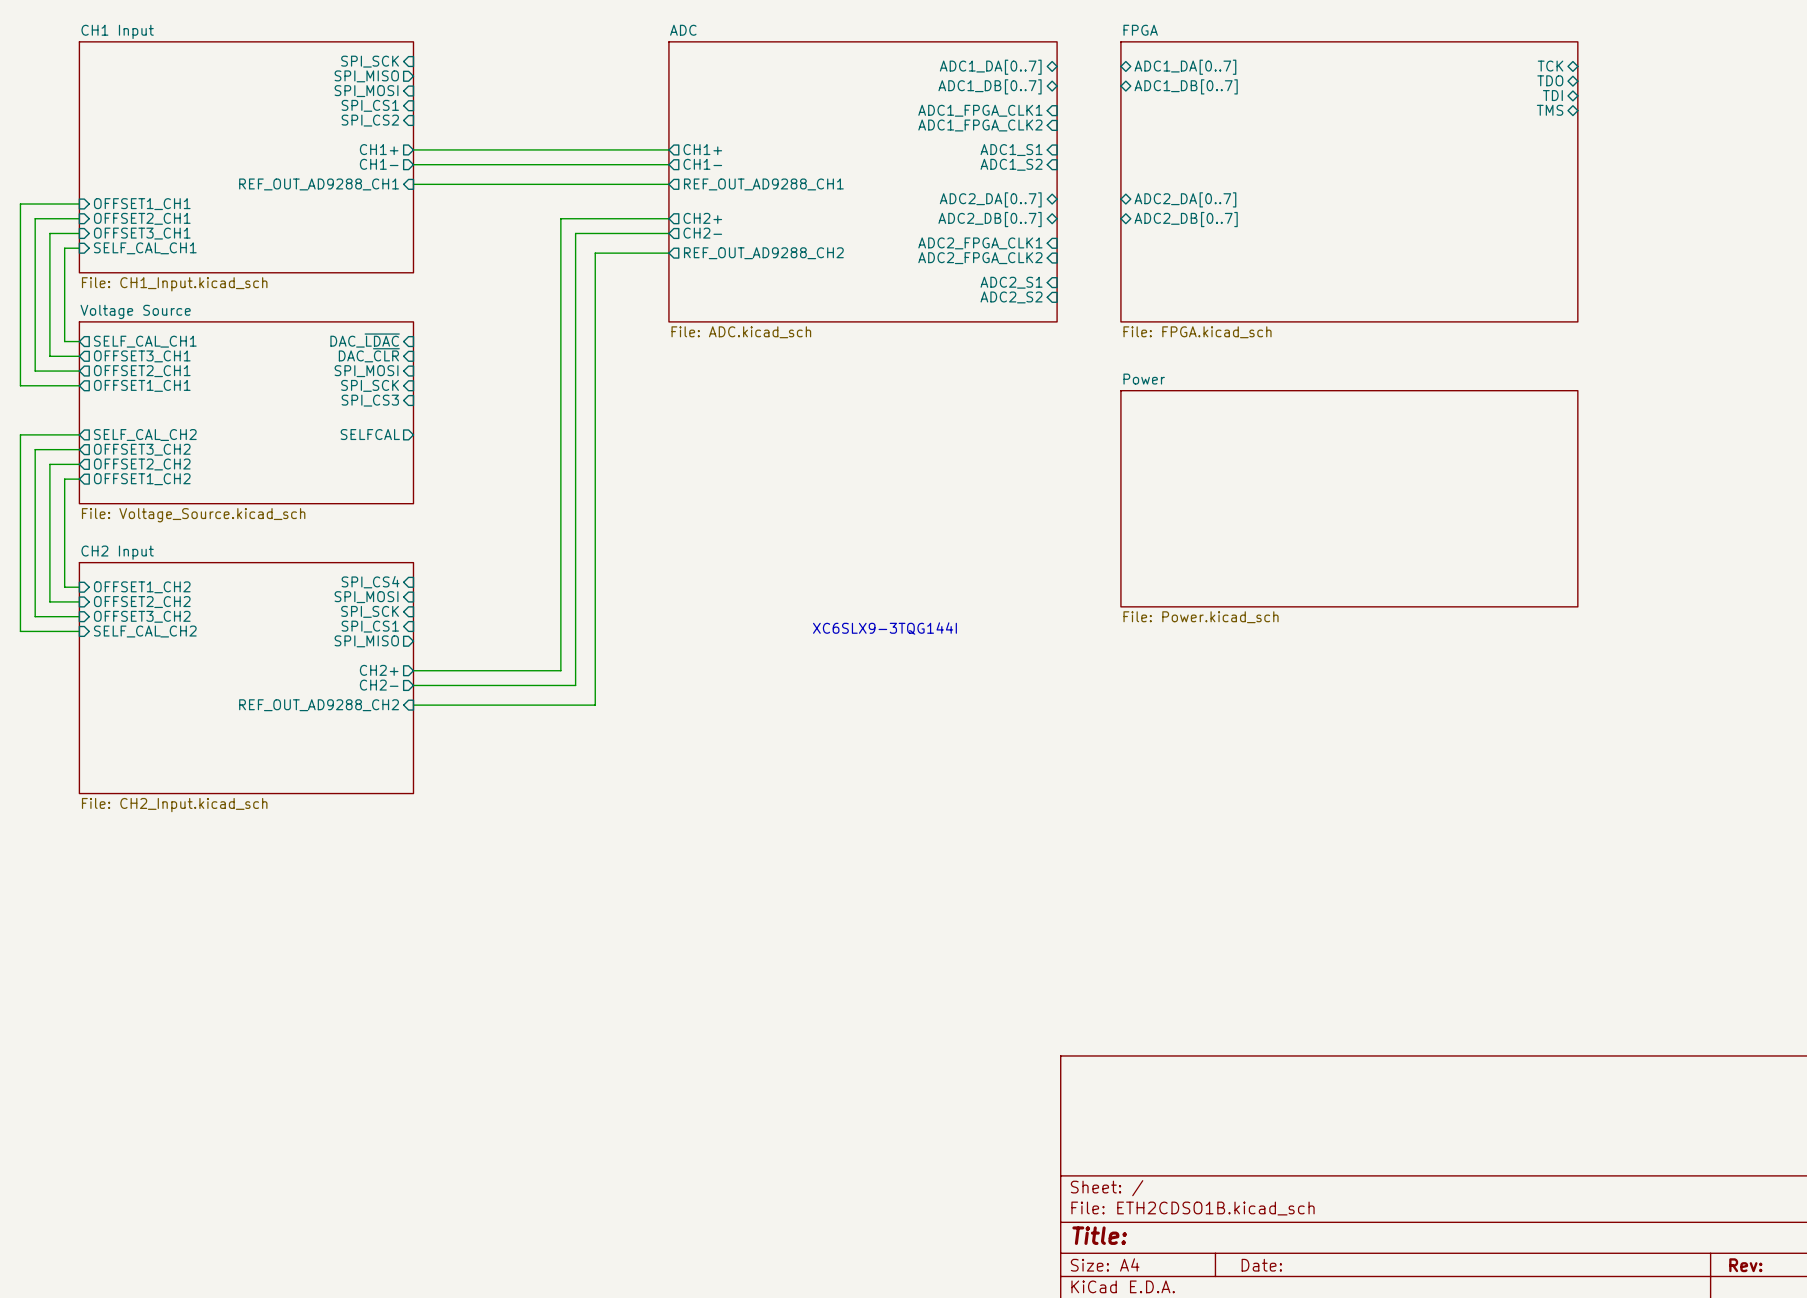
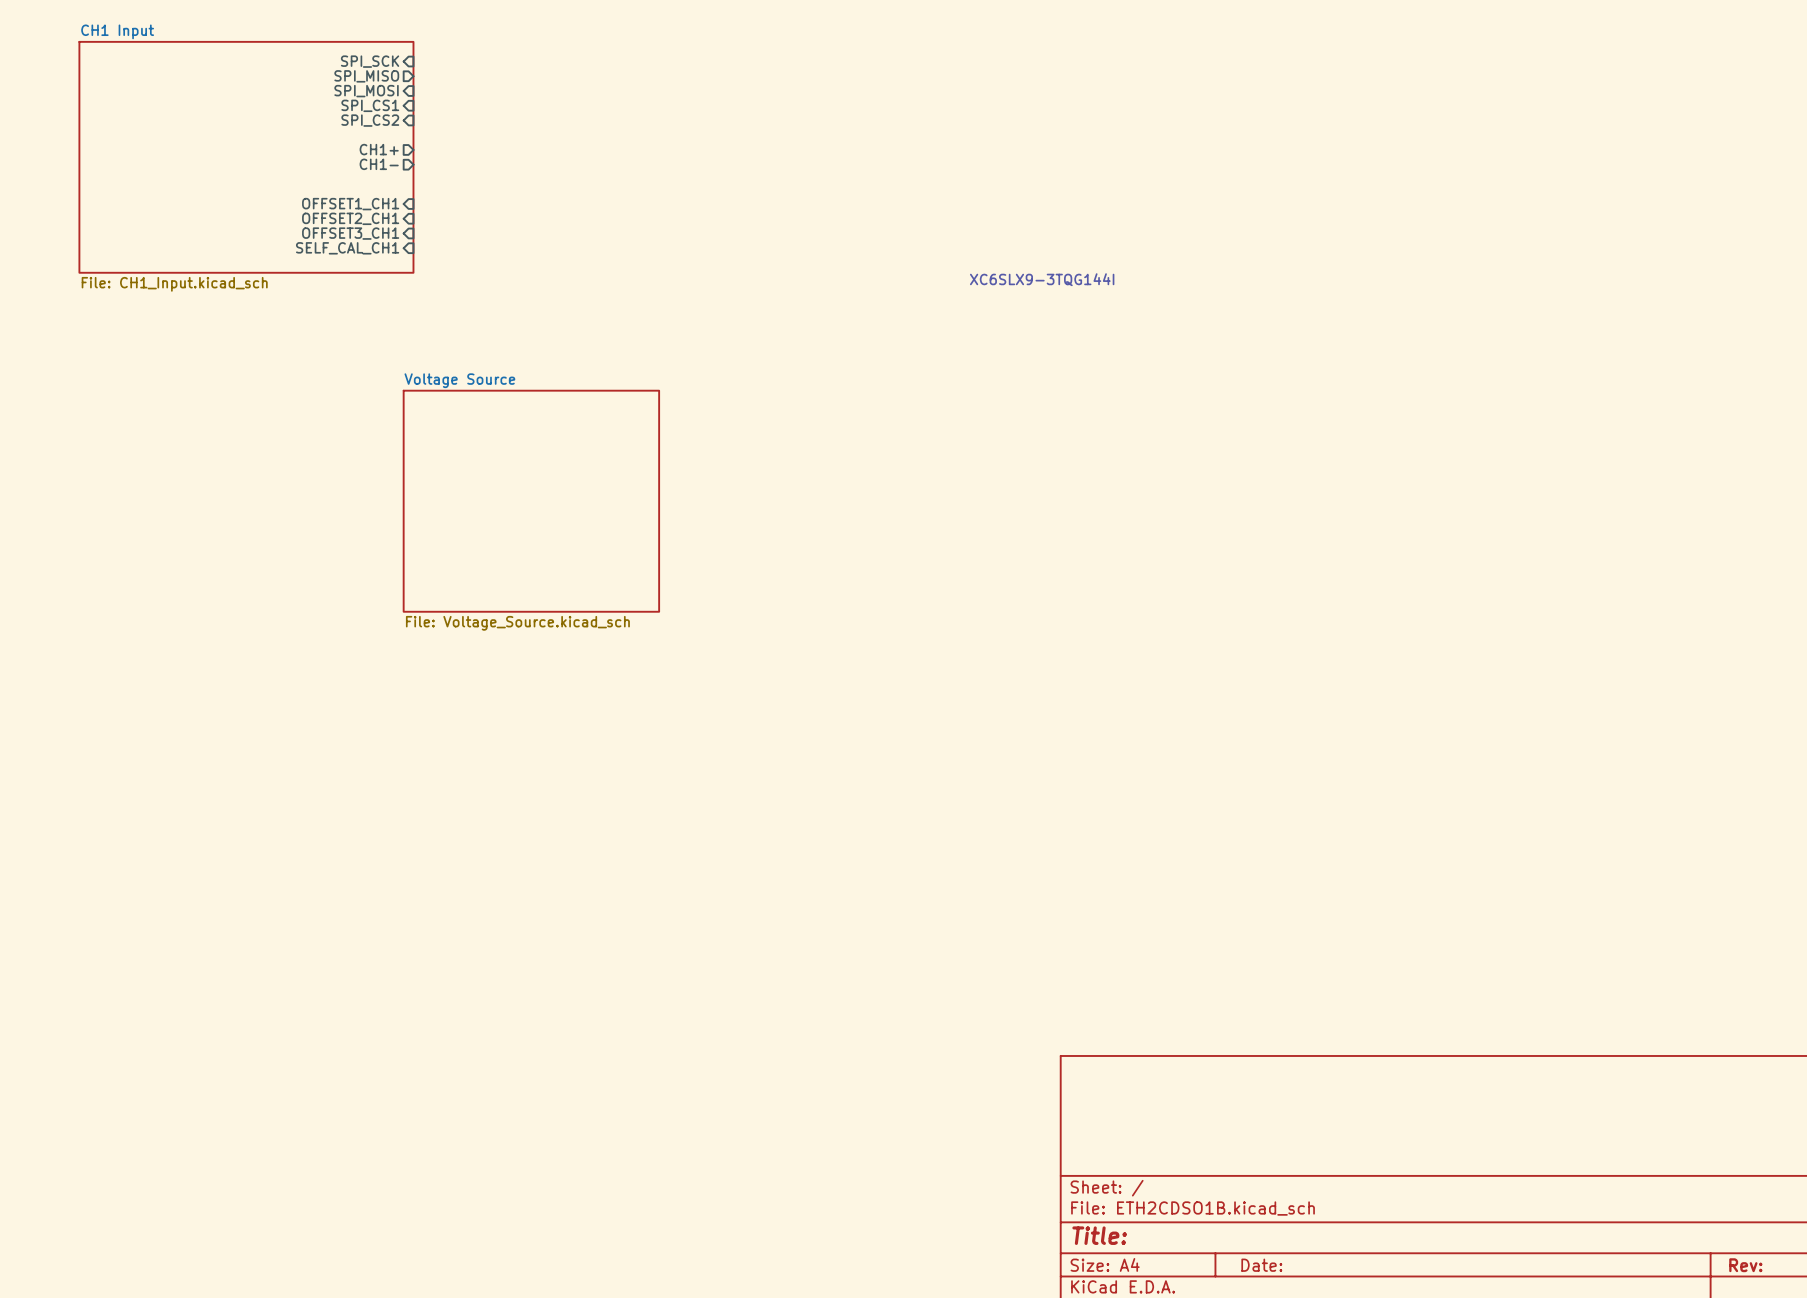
sheet pin: TCK (1550, 66) -> none
sheet pin: ADC1_DA[0..7] (990, 67) -> none
sheet pin: ADC1_DA[0..7] (1185, 67) -> none
sheet pin: TDO (1550, 80) -> none
sheet pin: ADC1_DB[0..7] (990, 86) -> none
sheet pin: ADC1_DB[0..7] (1186, 86) -> none
sheet pin: TDI (1552, 95) -> none
sheet pin: ADC1_FPGA_CLK1 (980, 110) -> none
sheet pin: TMS (1550, 110) -> none
sheet pin: ADC1_FPGA_CLK2 (980, 125) -> none
wire: (413, 149) (668, 149) -> none
sheet pin: CH1+ (702, 149) -> none
sheet pin: ADC1_S1 (1011, 150) -> none
wire: (413, 164) (668, 164) -> none
sheet pin: CH1- (702, 164) -> none
sheet pin: ADC1_S2 (1011, 164) -> none
sheet ADC: File: ADC.kicad_sch (863, 181) -> none
sheet FPGA: File: FPGA.kicad_sch (1349, 181) -> none
sheet pin: REF_OUT_AD9288_CH1 (319, 184) -> none
wire: (413, 184) (668, 184) -> none
sheet pin: REF_OUT_AD9288_CH1 (763, 184) -> none
sheet pin: ADC2_DA[0..7] (990, 199) -> none
sheet pin: ADC2_DA[0..7] (1185, 199) -> none
wire: (79, 204) (20, 204) (20, 385) (79, 385) -> none
sheet pin: OFFSET1_CH1 (142, 204) -> none
sheet pin: none -> OFFSET1_CH1 (350, 204)
wire: (79, 218) (35, 218) (35, 371) (79, 371) -> none
sheet pin: OFFSET2_CH1 (142, 218) -> none
sheet pin: none -> OFFSET2_CH1 (350, 218)
wire: (668, 218) (560, 218) (560, 670) (413, 670) -> none
sheet pin: CH2+ (702, 218) -> none
sheet pin: ADC2_DB[0..7] (990, 219) -> none
sheet pin: ADC2_DB[0..7] (1186, 219) -> none
wire: (79, 233) (49, 233) (49, 356) (79, 356) -> none
sheet pin: OFFSET3_CH1 (142, 233) -> none
sheet pin: none -> OFFSET3_CH1 (350, 233)
wire: (668, 233) (575, 233) (575, 685) (413, 685) -> none
sheet pin: CH2- (702, 233) -> none
sheet pin: ADC2_FPGA_CLK1 (980, 243) -> none
wire: (79, 248) (64, 248) (64, 341) (79, 341) -> none
sheet pin: SELF_CAL_CH1 (145, 248) -> none
sheet pin: none -> SELF_CAL_CH1 (347, 248)
wire: (668, 253) (595, 253) (595, 705) (413, 705) -> none
sheet pin: REF_OUT_AD9288_CH2 (763, 253) -> none
sheet pin: ADC2_FPGA_CLK2 (980, 258) -> none
text: none -> XC6SLX9-3TQG144I (1042, 279)
sheet pin: ADC2_S1 (1011, 282) -> none
sheet pin: ADC2_S2 (1011, 297) -> none
sheet pin: DAC_~{LDAC} (365, 340) -> none
sheet pin: SELF_CAL_CH1 (145, 341) -> none
sheet pin: DAC_~{CLR} (369, 355) -> none
sheet pin: OFFSET3_CH1 (142, 356) -> none
sheet pin: OFFSET2_CH1 (142, 371) -> none
sheet pin: SPI_MOSI (366, 371) -> none
sheet pin: OFFSET1_CH1 (142, 385) -> none
sheet pin: SPI_SCK (370, 385) -> none
sheet pin: SPI_CS3 (370, 400) -> none
sheet Voltage Source: File: Voltage_Source.kicad_sch (246, 412) -> none
wire: (79, 434) (20, 434) (20, 631) (79, 631) -> none
sheet pin: SELFCAL (370, 434) -> none
sheet pin: SELF_CAL_CH2 (145, 435) -> none
wire: (79, 449) (35, 449) (35, 616) (79, 616) -> none
sheet pin: OFFSET3_CH2 (142, 449) -> none
wire: (79, 464) (49, 464) (49, 601) (79, 601) -> none
sheet pin: OFFSET2_CH2 (142, 464) -> none
wire: (79, 479) (64, 479) (64, 587) (79, 587) -> none
sheet pin: OFFSET1_CH2 (142, 479) -> none
sheet Power: File: Power.kicad_sch (1349, 498) -> none
sheet Voltage Source: none -> File: Voltage_Source.kicad_sch (531, 501)
sheet pin: SPI_CS4 (370, 582) -> none
sheet pin: OFFSET1_CH2 (142, 587) -> none
sheet pin: SPI_MOSI (366, 597) -> none
sheet pin: OFFSET2_CH2 (142, 602) -> none
sheet pin: SPI_SCK (370, 611) -> none
sheet pin: OFFSET3_CH2 (142, 616) -> none
sheet pin: SPI_CS1 (370, 626) -> none
text: XC6SLX9-3TQG144I (884, 628) -> none
sheet pin: SELF_CAL_CH2 (145, 631) -> none
sheet pin: SPI_MISO (366, 641) -> none
sheet pin: CH2+ (379, 670) -> none
sheet CH2 Input: File: CH2_Input.kicad_sch (246, 678) -> none
sheet pin: CH2- (379, 685) -> none
sheet pin: REF_OUT_AD9288_CH2 (319, 705) -> none

